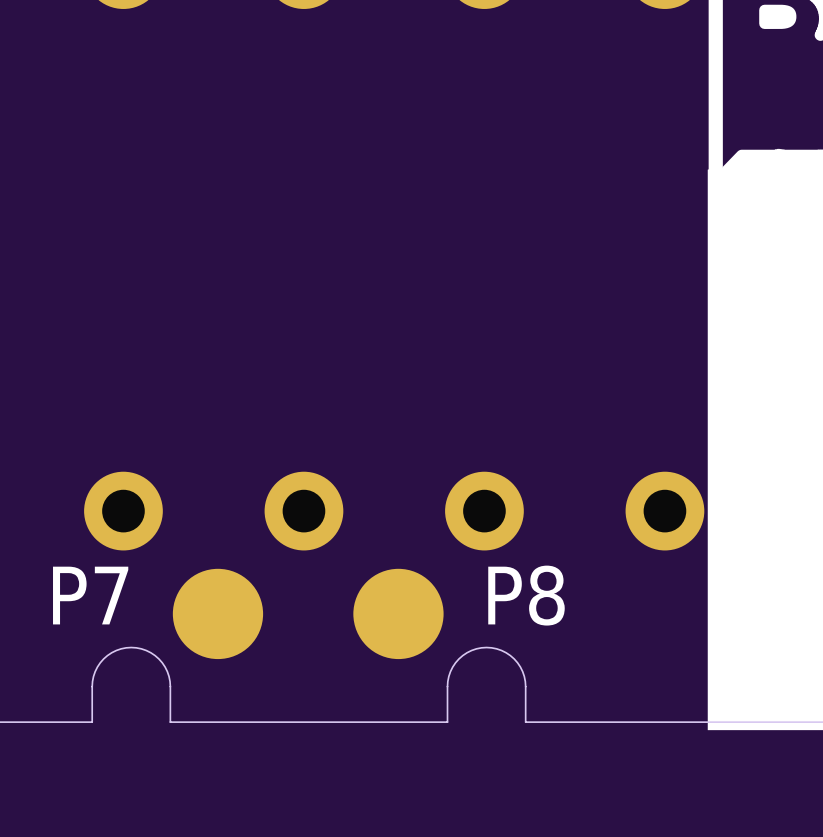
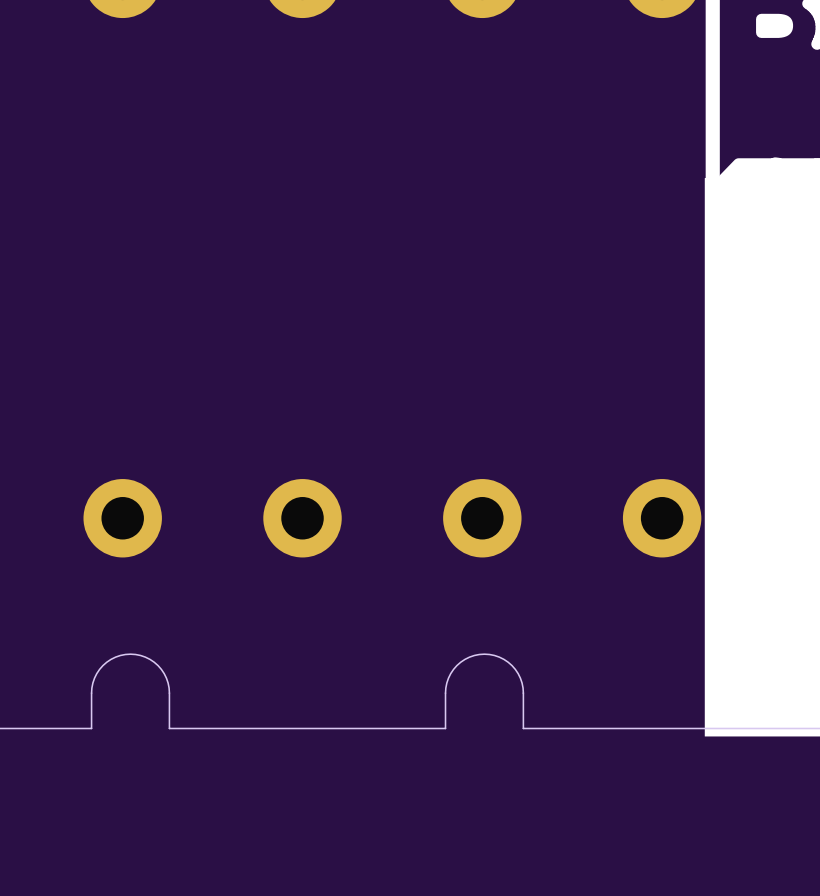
text: P7 (90, 595) -> none
text: P8 (526, 595) -> none
part: (217, 613) -> none
part: (398, 613) -> none

